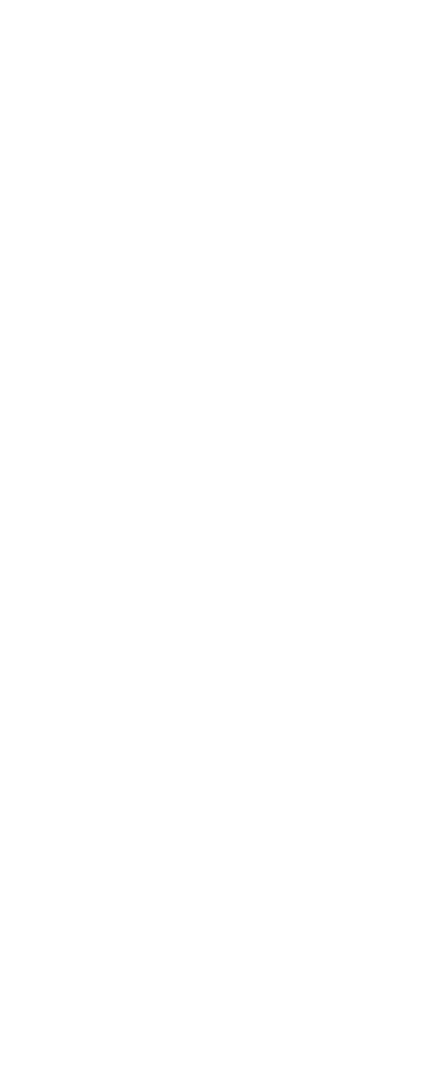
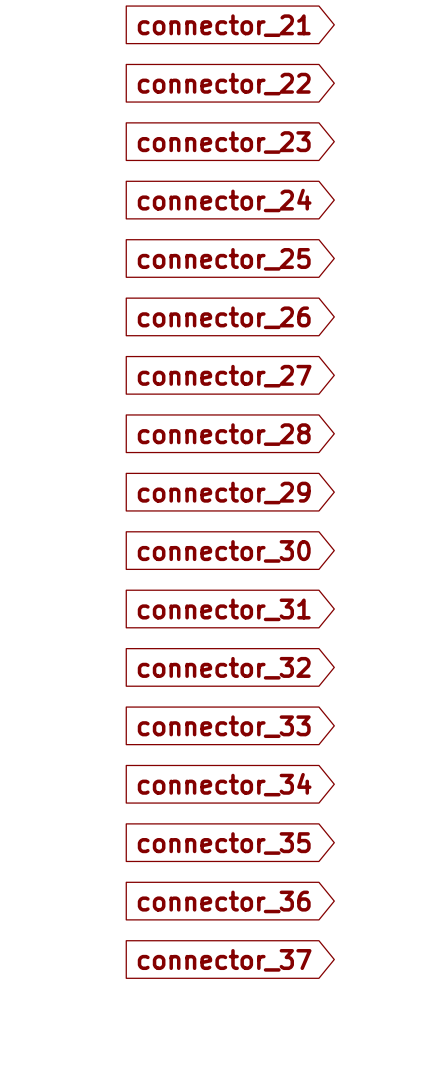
global label: none -> connector_21 (224, 25)
global label: none -> connector_22 (224, 84)
global label: none -> connector_23 (224, 142)
global label: none -> connector_24 (224, 200)
global label: none -> connector_25 (224, 259)
global label: none -> connector_26 (224, 317)
global label: none -> connector_27 (224, 376)
global label: none -> connector_28 (224, 434)
global label: none -> connector_29 (224, 493)
global label: none -> connector_30 (224, 551)
global label: none -> connector_31 (224, 609)
global label: none -> connector_32 (224, 668)
global label: none -> connector_33 (224, 726)
global label: none -> connector_34 (224, 784)
global label: none -> connector_35 (224, 843)
global label: none -> connector_36 (224, 901)
global label: none -> connector_37 (224, 960)

